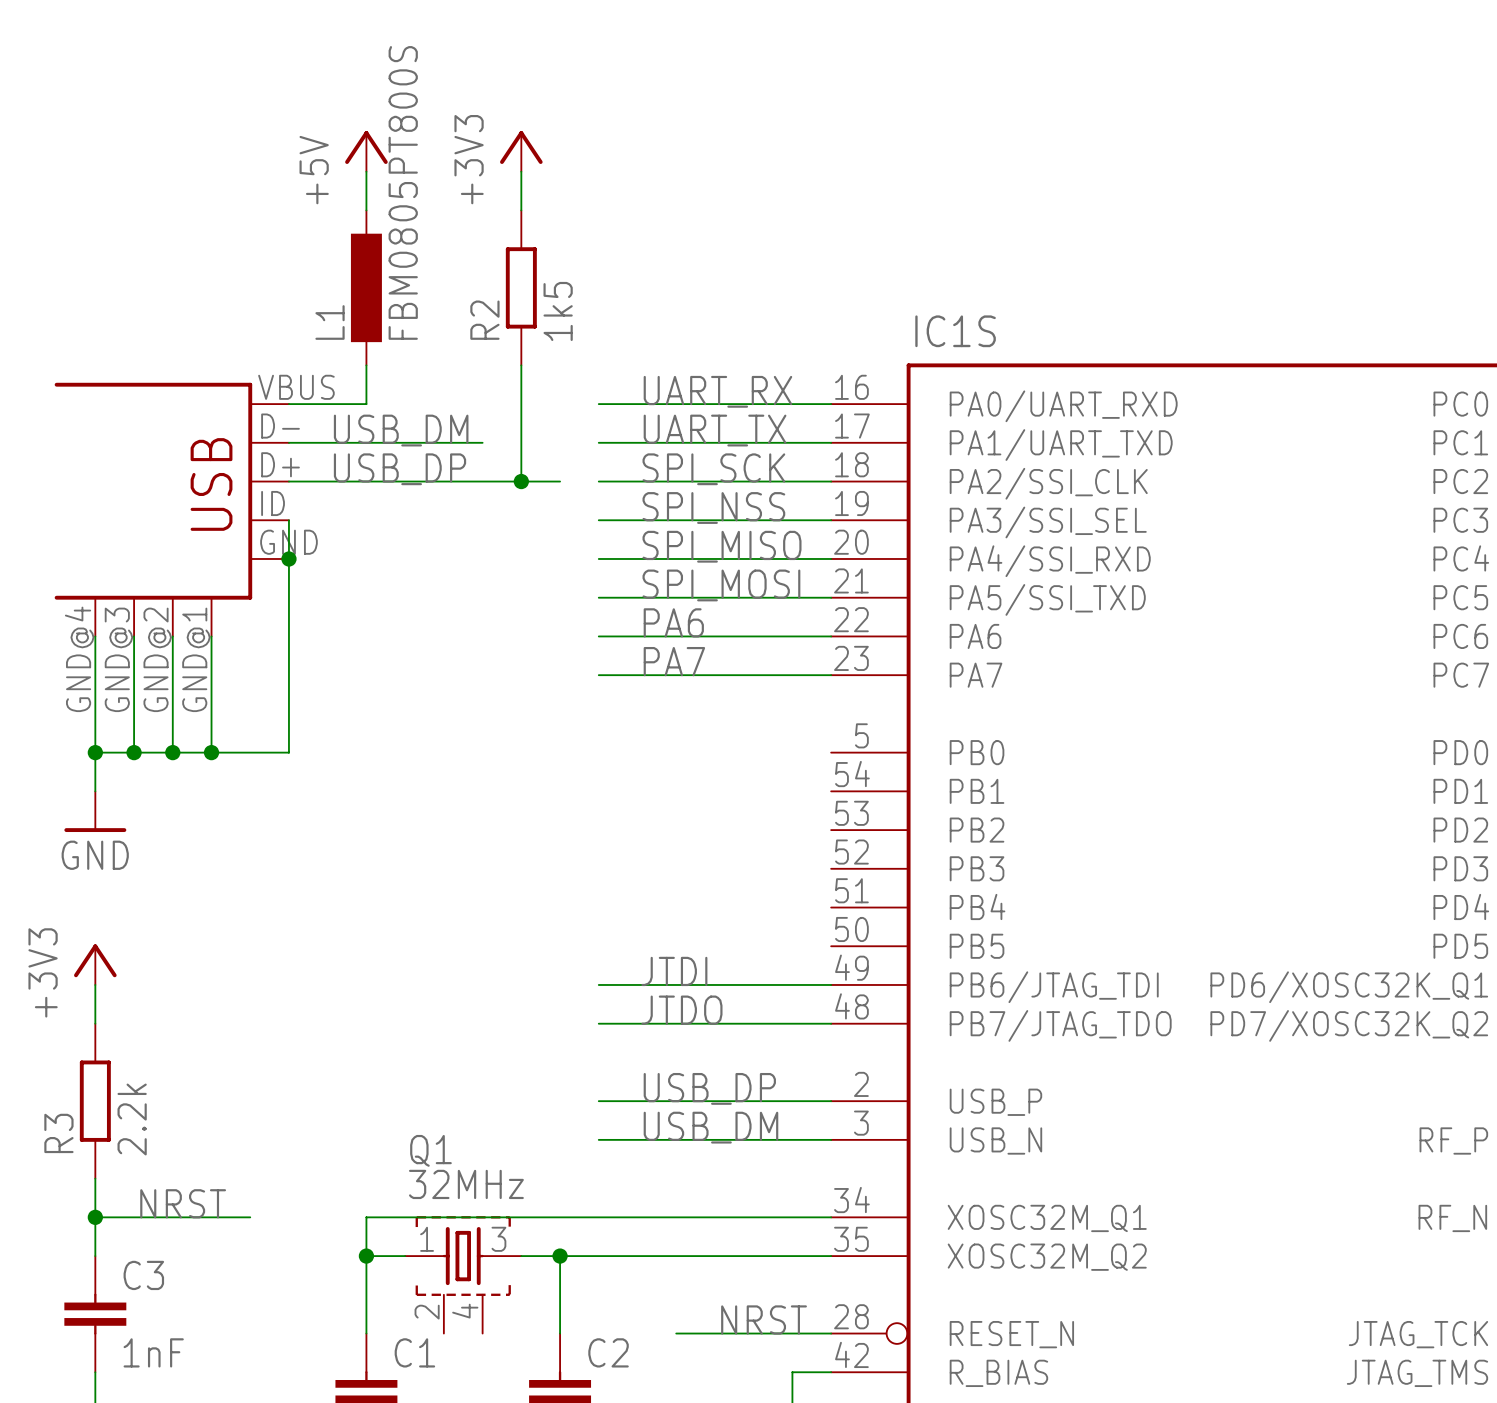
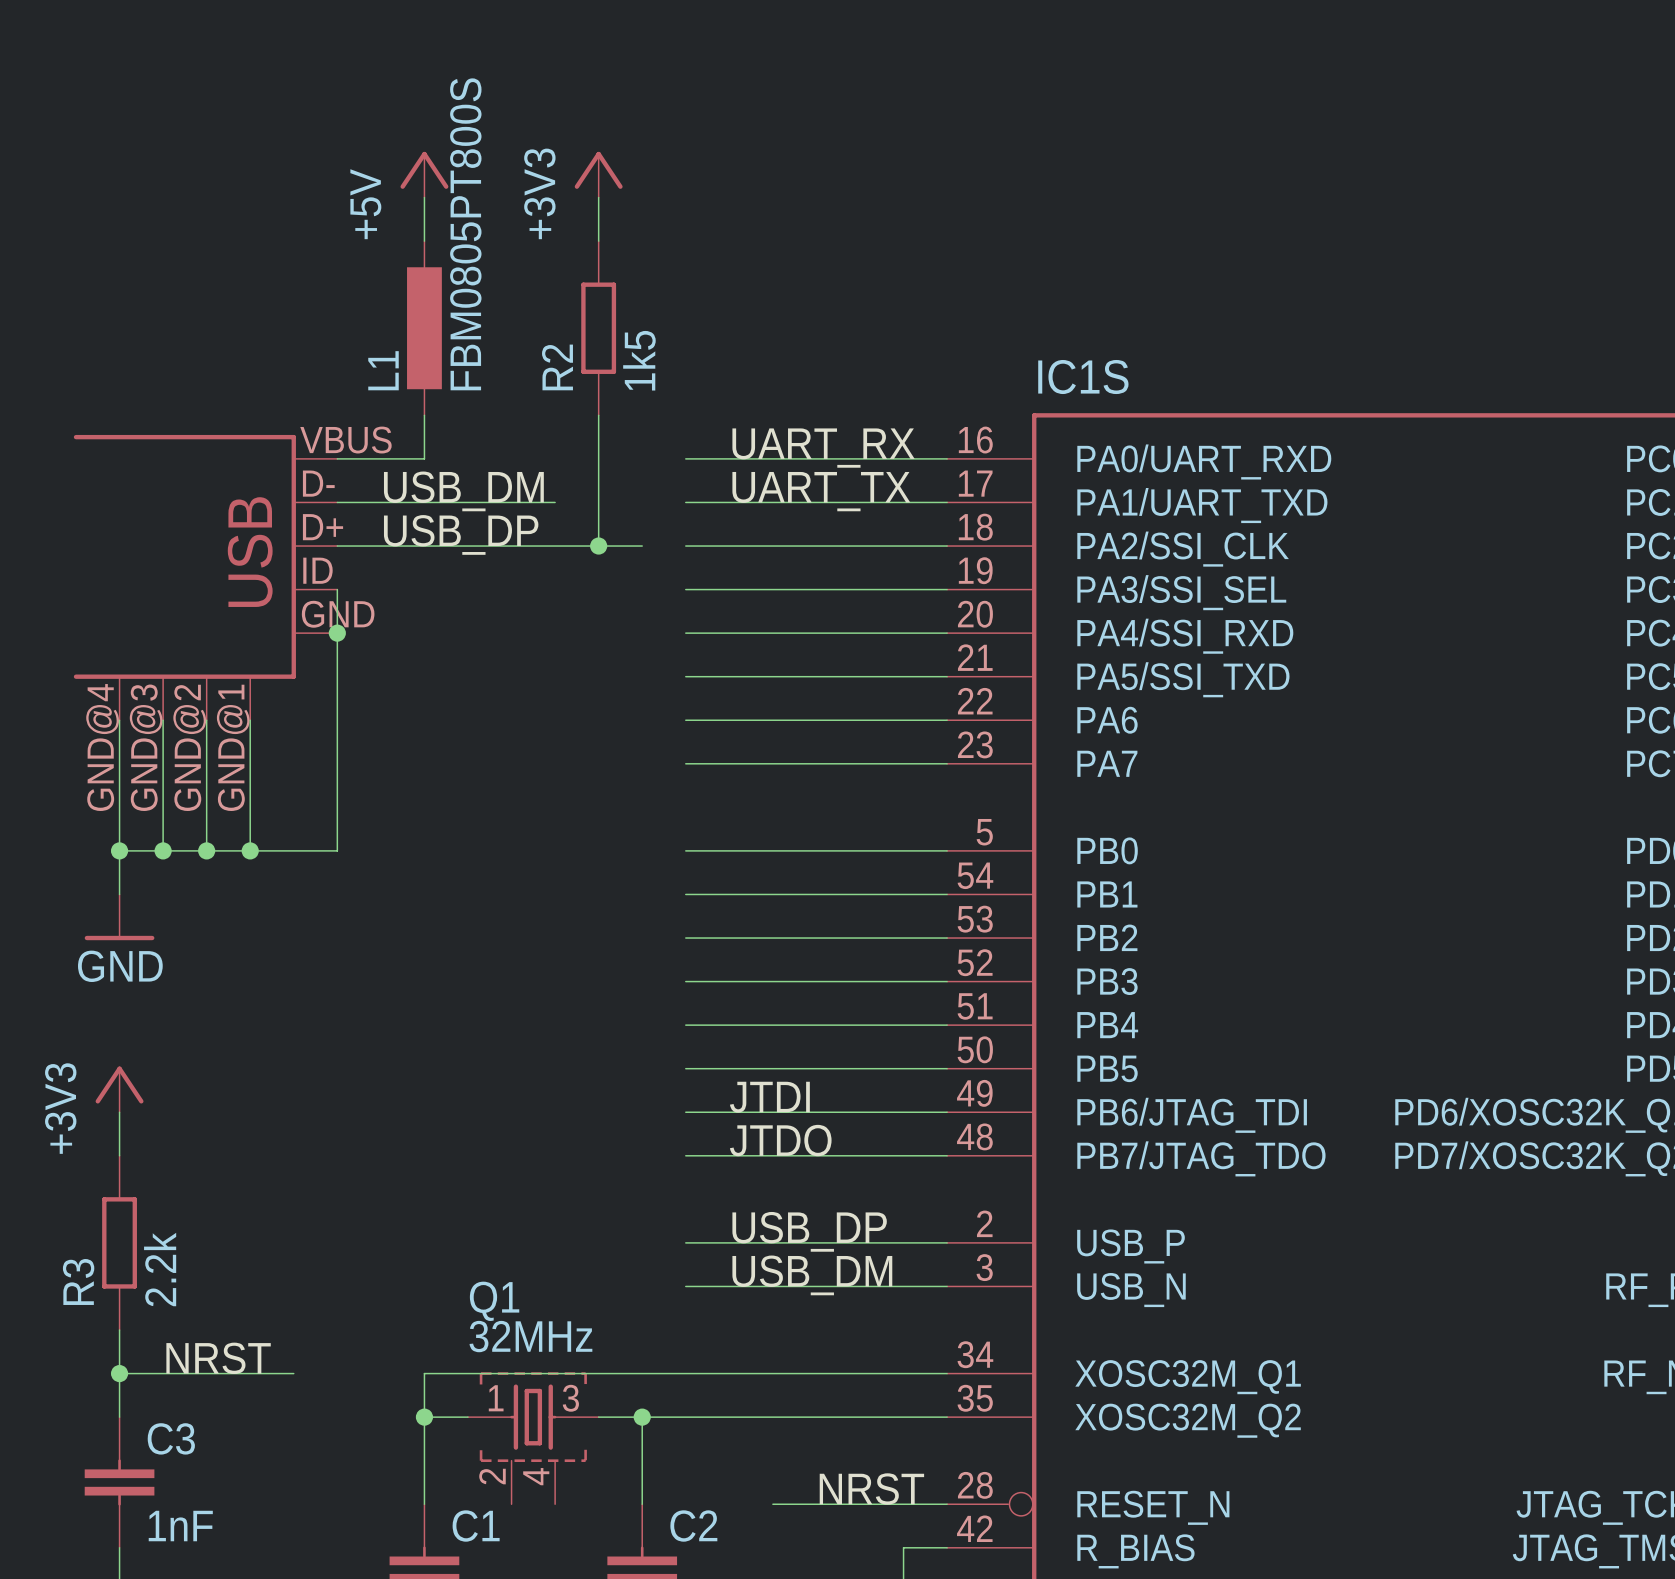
label: SPI_SCK (713, 469) -> none
label: SPI_NSS (713, 508) -> none
label: SPI_MISO (722, 546) -> none
label: SPI_MOSI (721, 585) -> none
label: PA6 (673, 622) -> none
label: PA7 (674, 661) -> none
wire: none -> (685, 850) (947, 850)
wire: none -> (685, 894) (947, 894)
wire: none -> (685, 938) (947, 938)
wire: none -> (685, 981) (947, 981)
wire: none -> (685, 1025) (947, 1025)
wire: none -> (685, 1068) (947, 1068)

